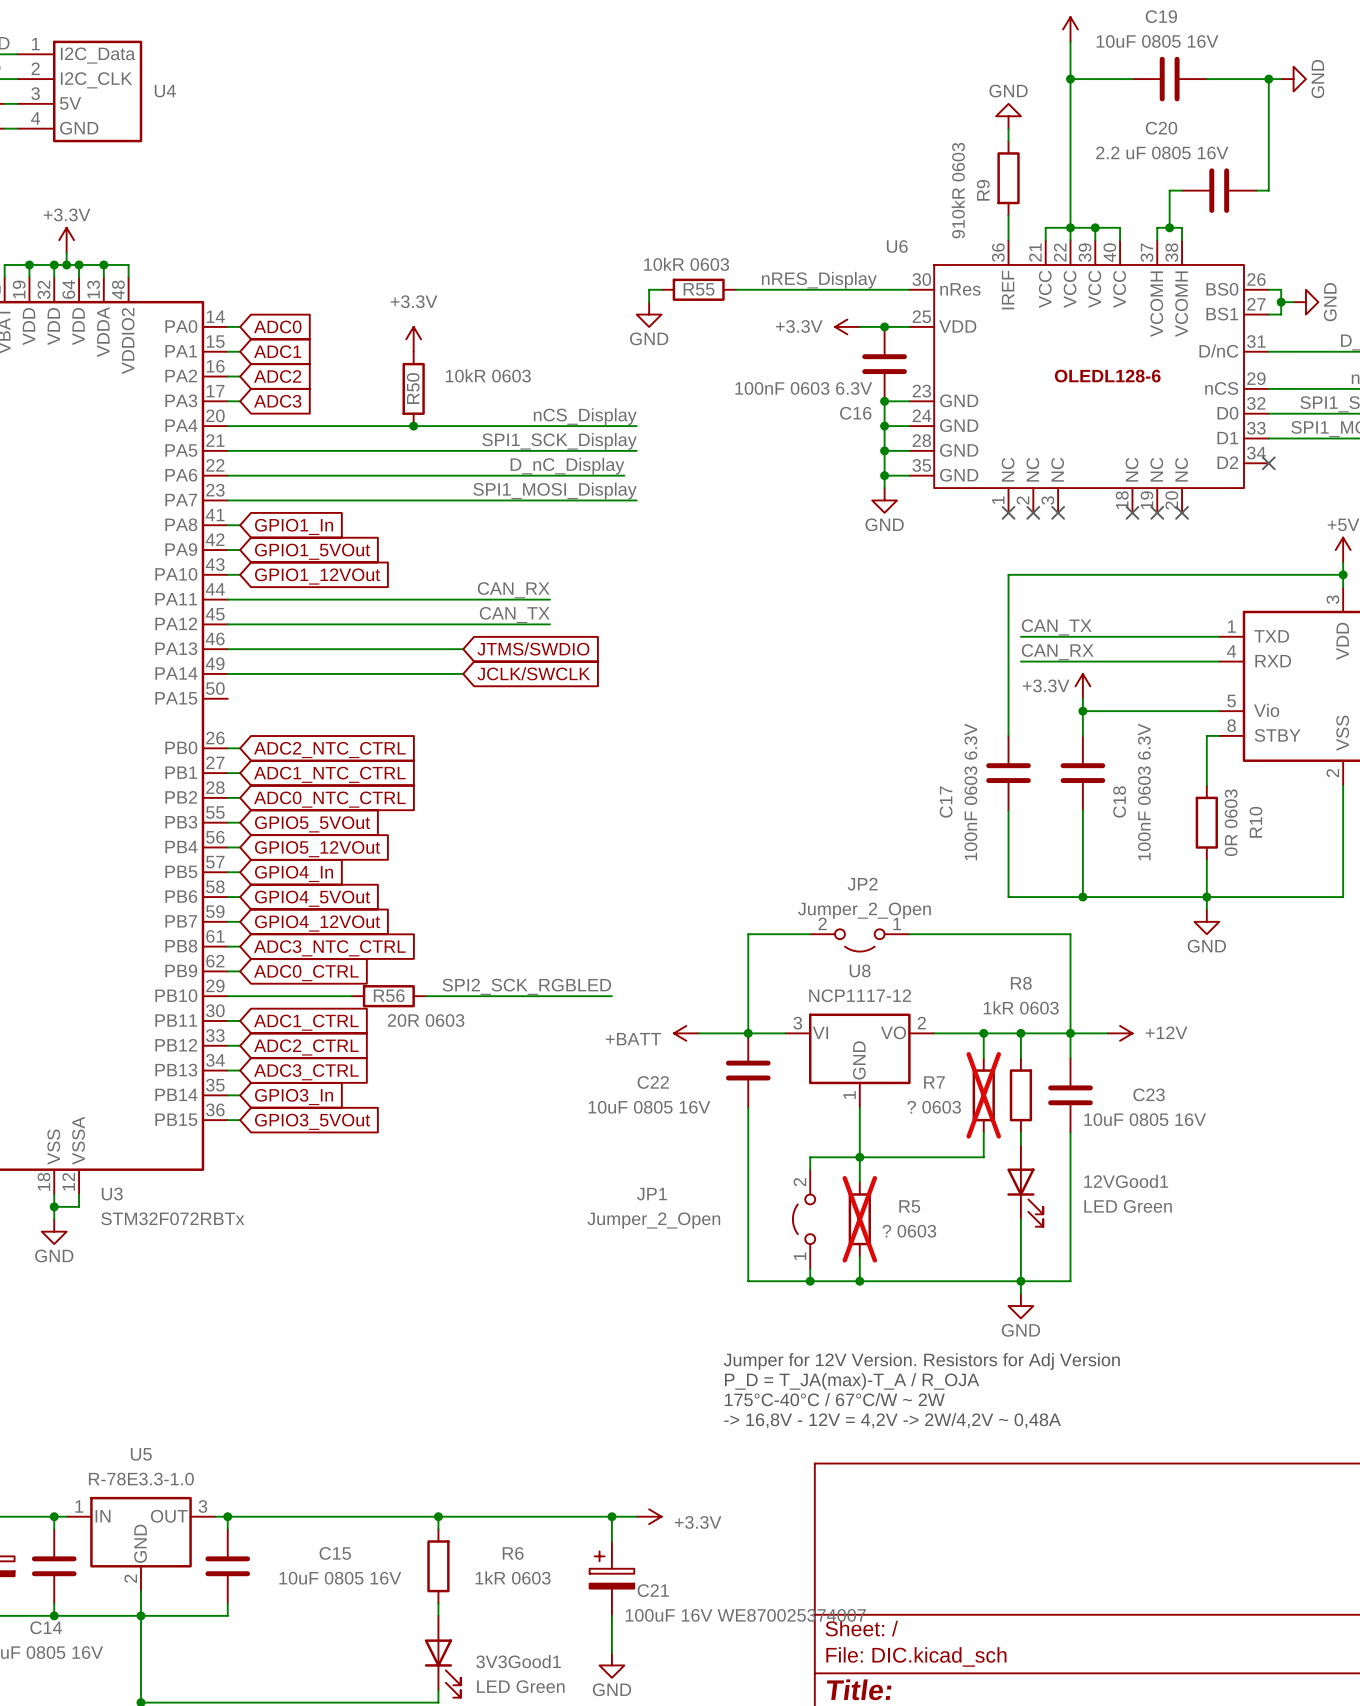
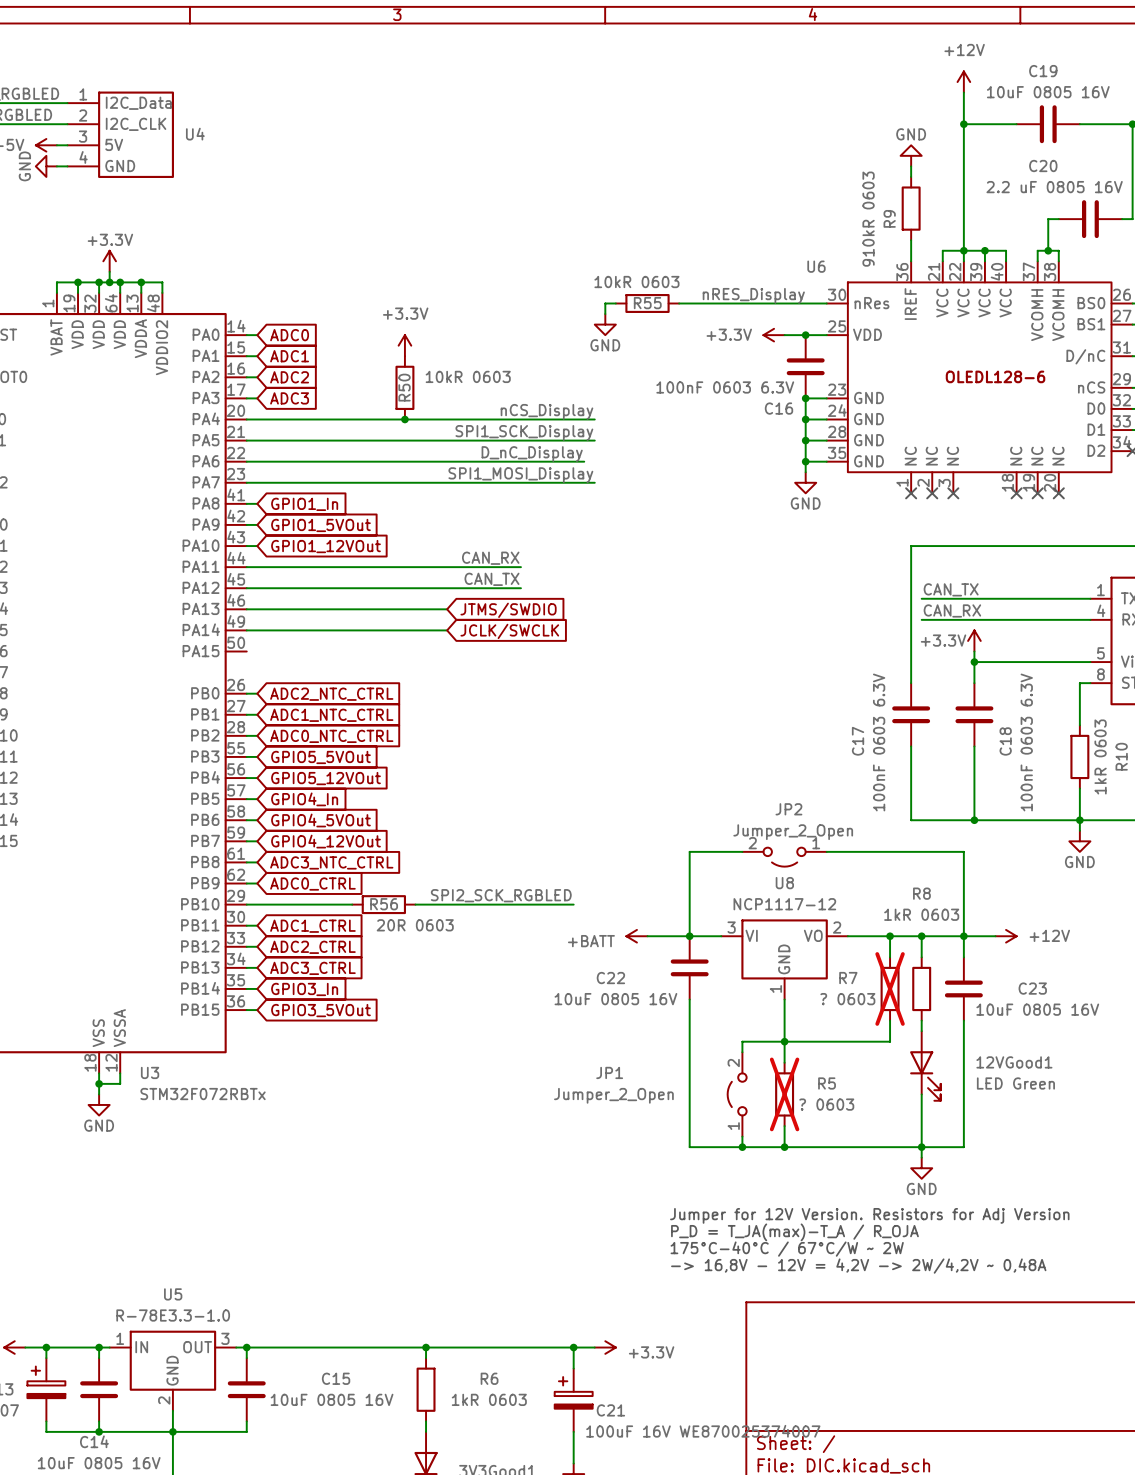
R10 value: 0R 0603 (1231, 822) -> 1kR 0603 (1100, 756)

